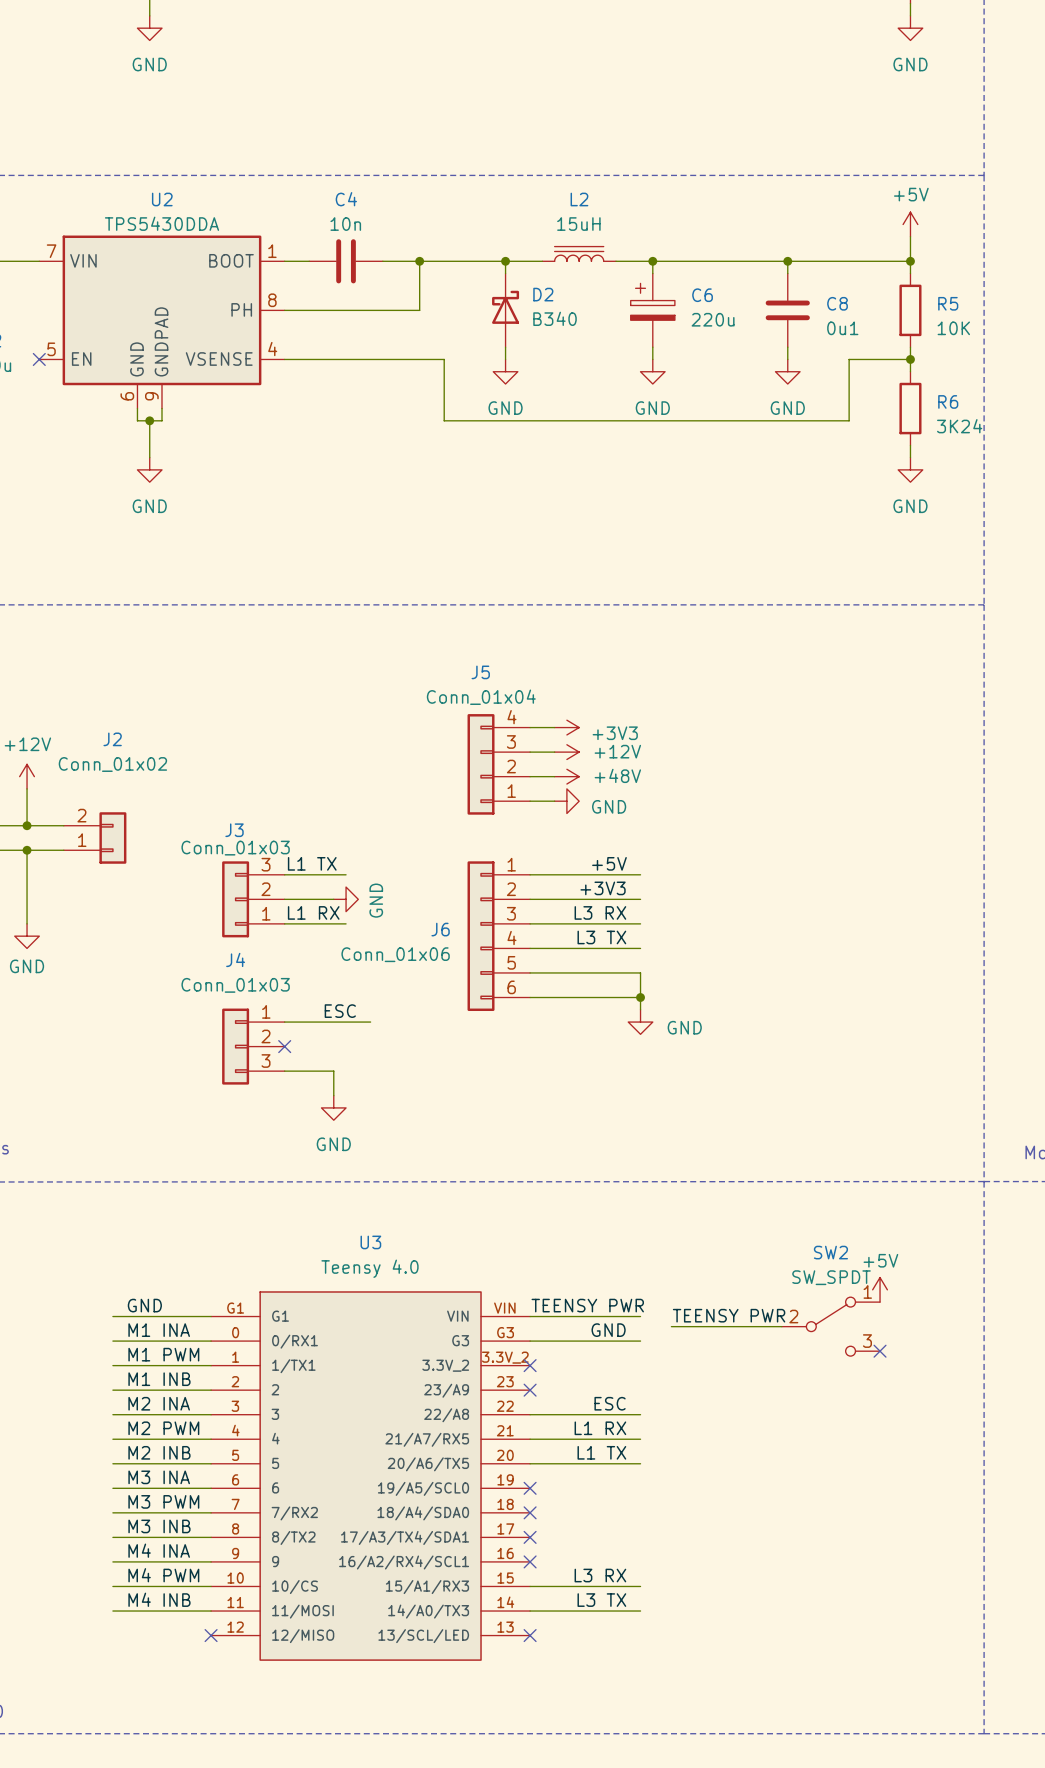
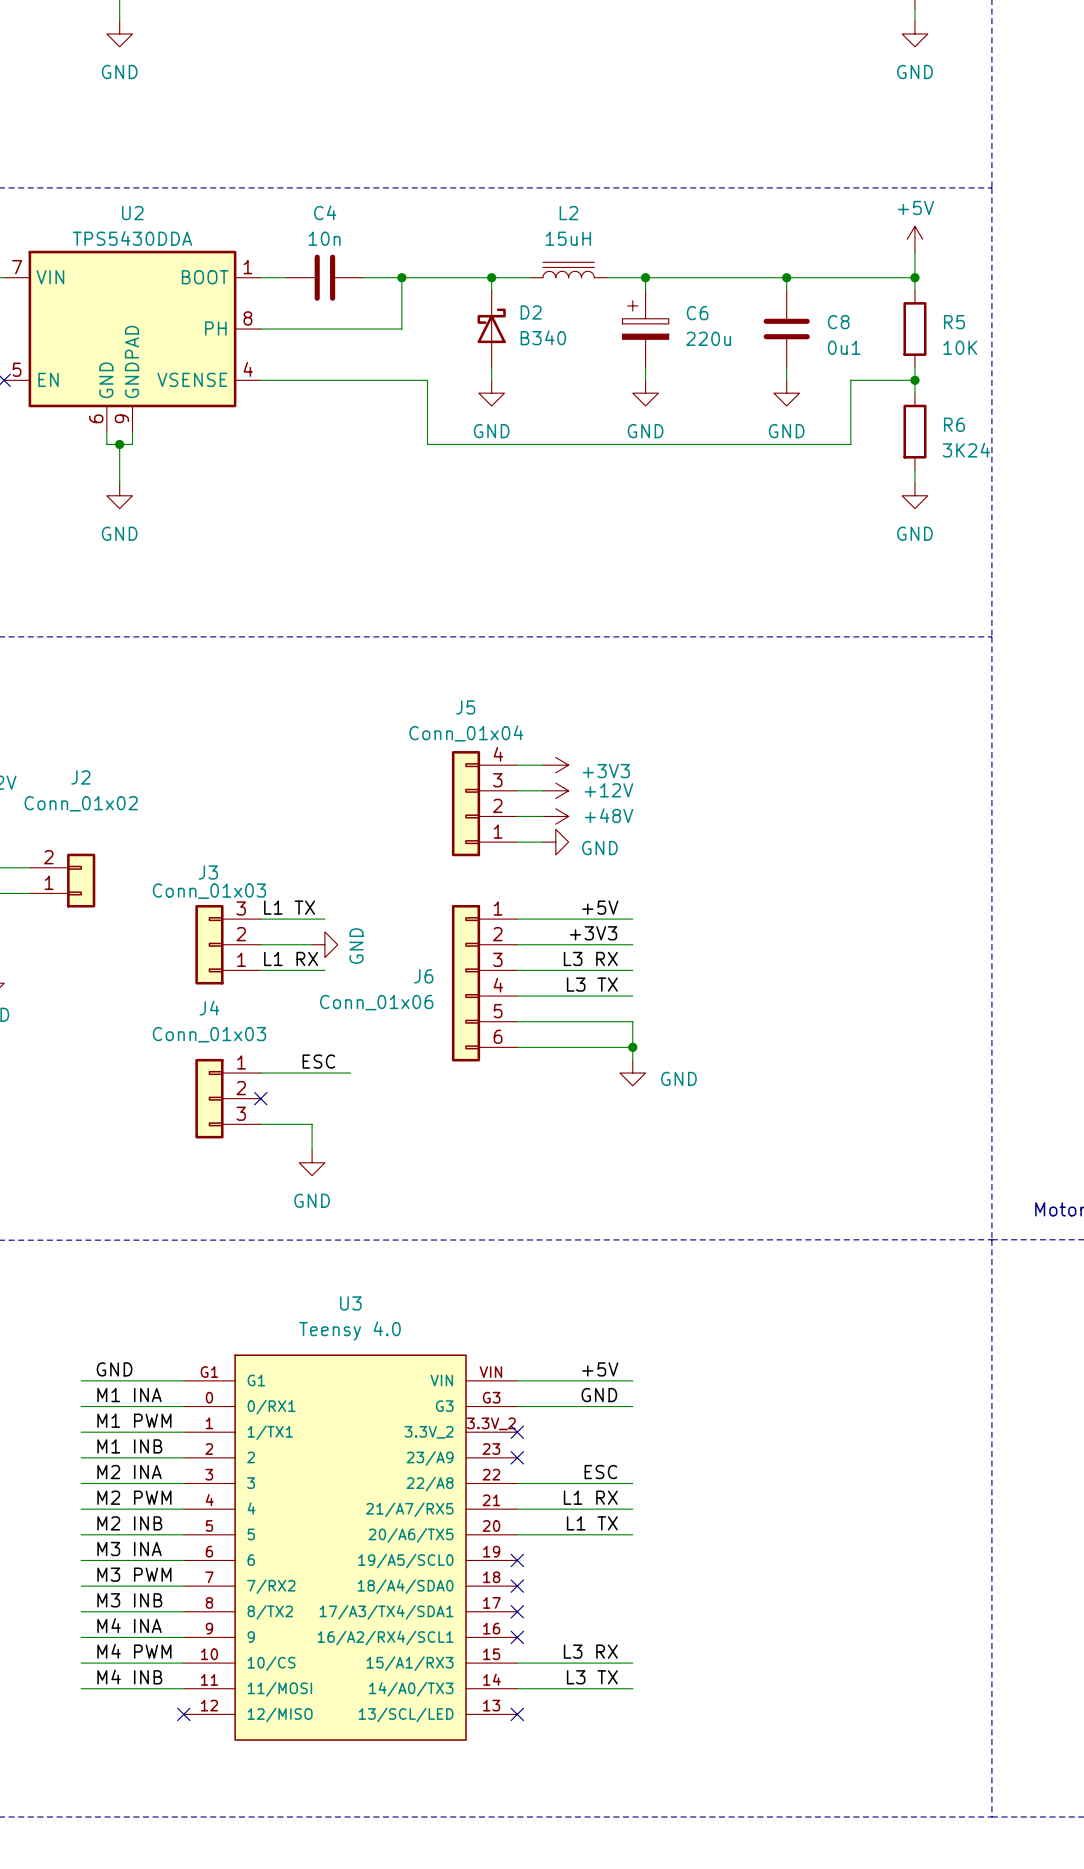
power symbol: +5V (880, 1289) -> none
label: TEENSY PWR (587, 1305) -> none
label: none -> +5V (600, 1369)
label: TEENSY PWR (729, 1315) -> none
wire: (671, 1326) (781, 1326) -> none
SW2: SW_SPDT (830, 1326) -> none
no-connect mark: (880, 1351) -> none

